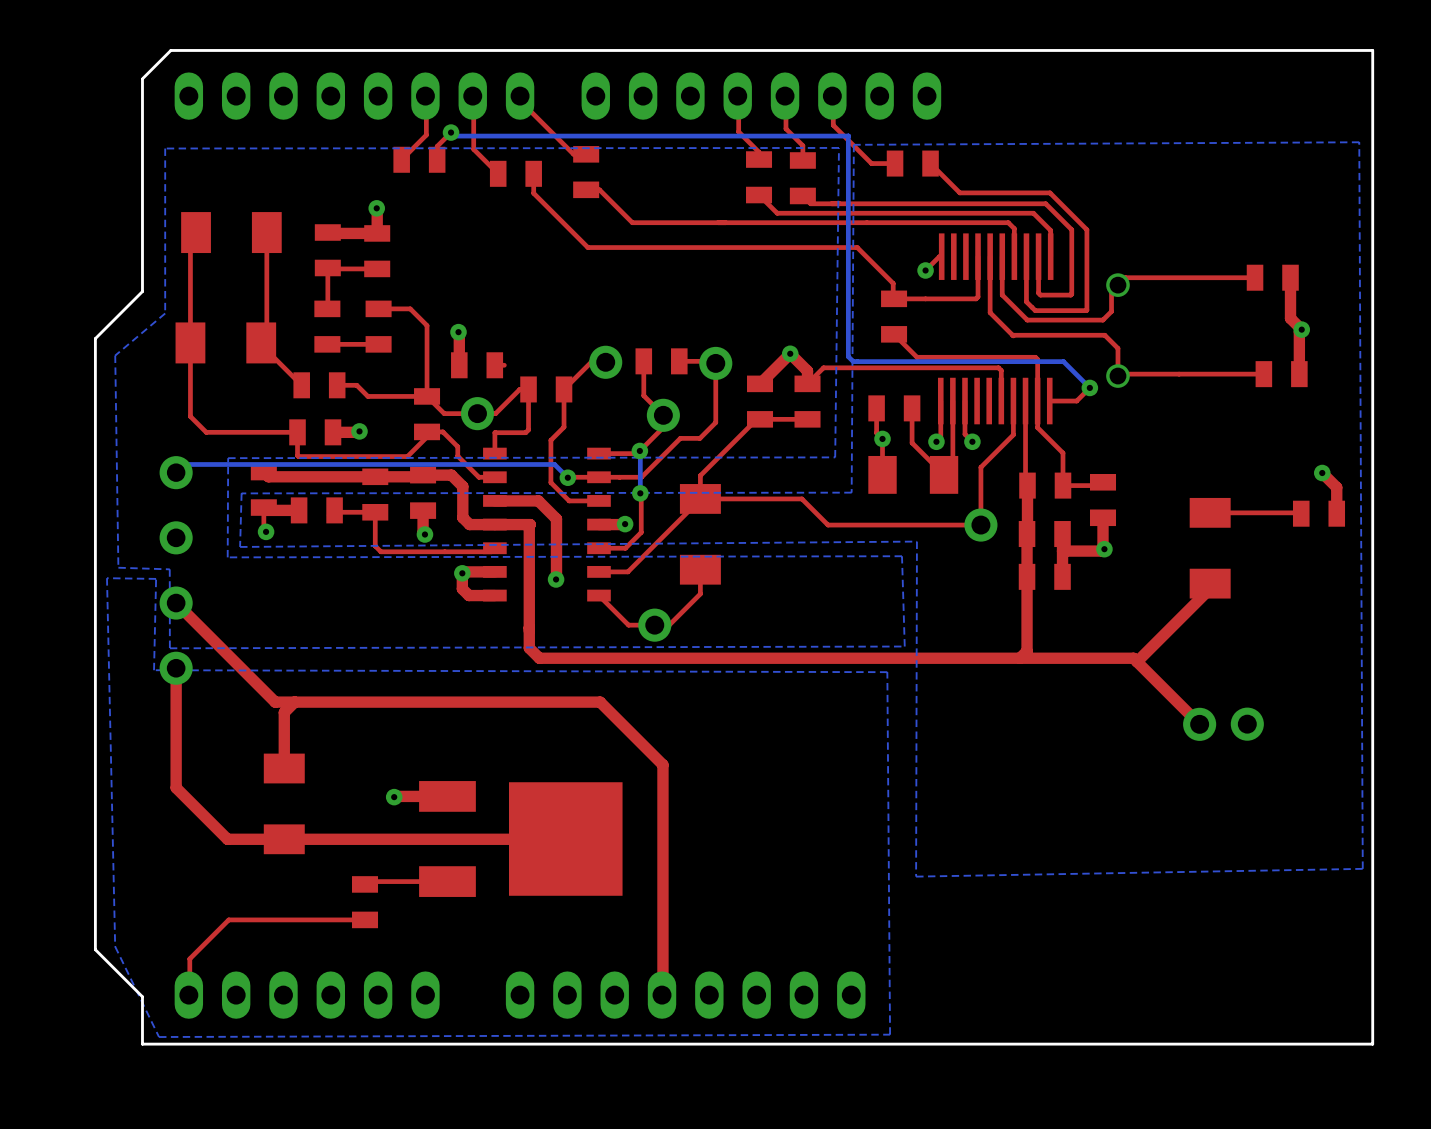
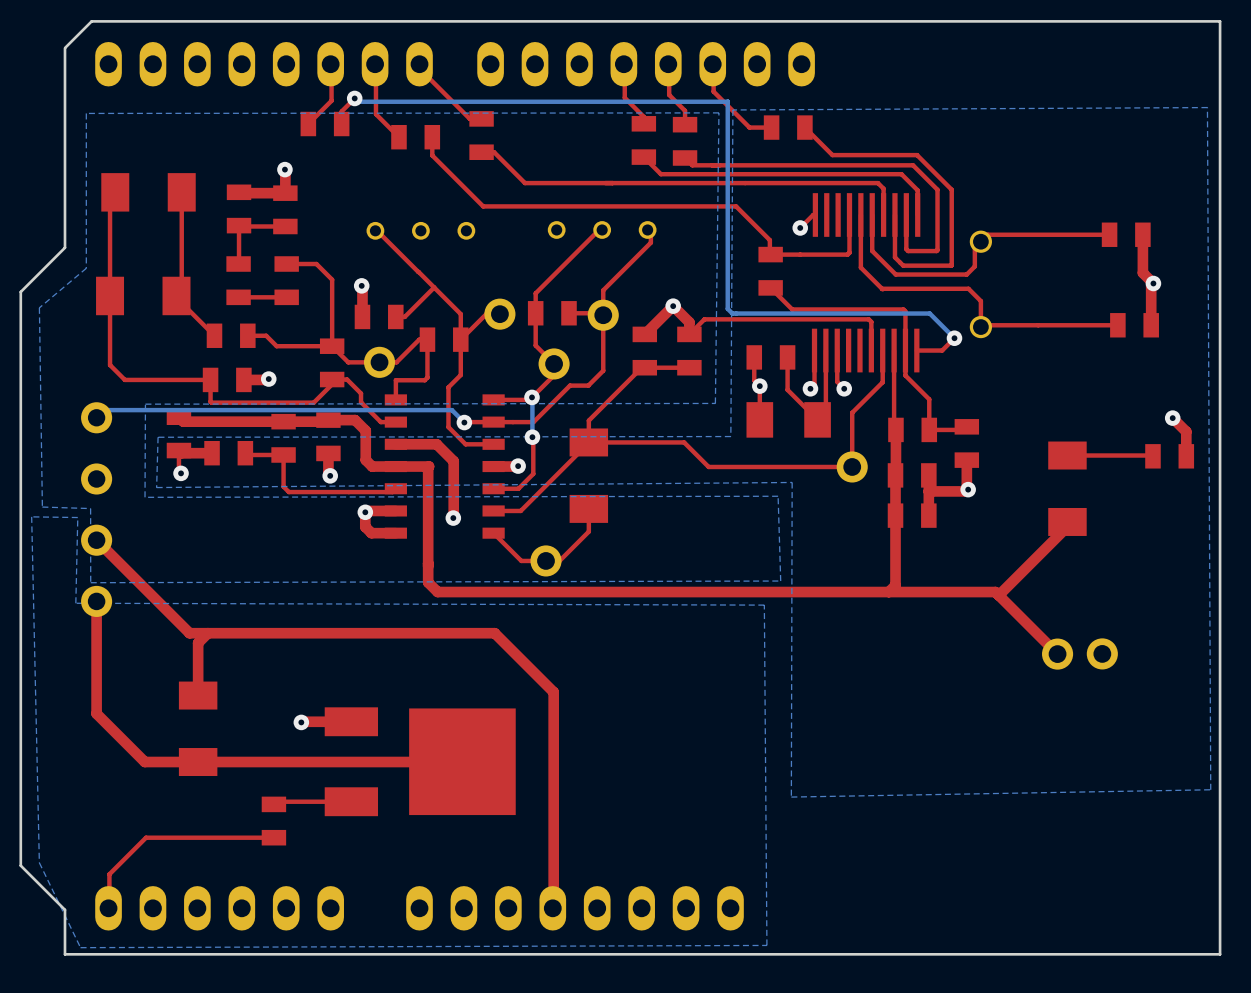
top track: none -> (605, 228) (600, 228) (535, 293) (535, 313)
top track: none -> (650, 228) (650, 242) (603, 290) (603, 315)
part: none -> (602, 229)
part: none -> (420, 230)
top track: none -> (380, 234) (418, 271)
top track: none -> (418, 271) (460, 314) (460, 339)
top track: none -> (434, 287) (404, 316)

